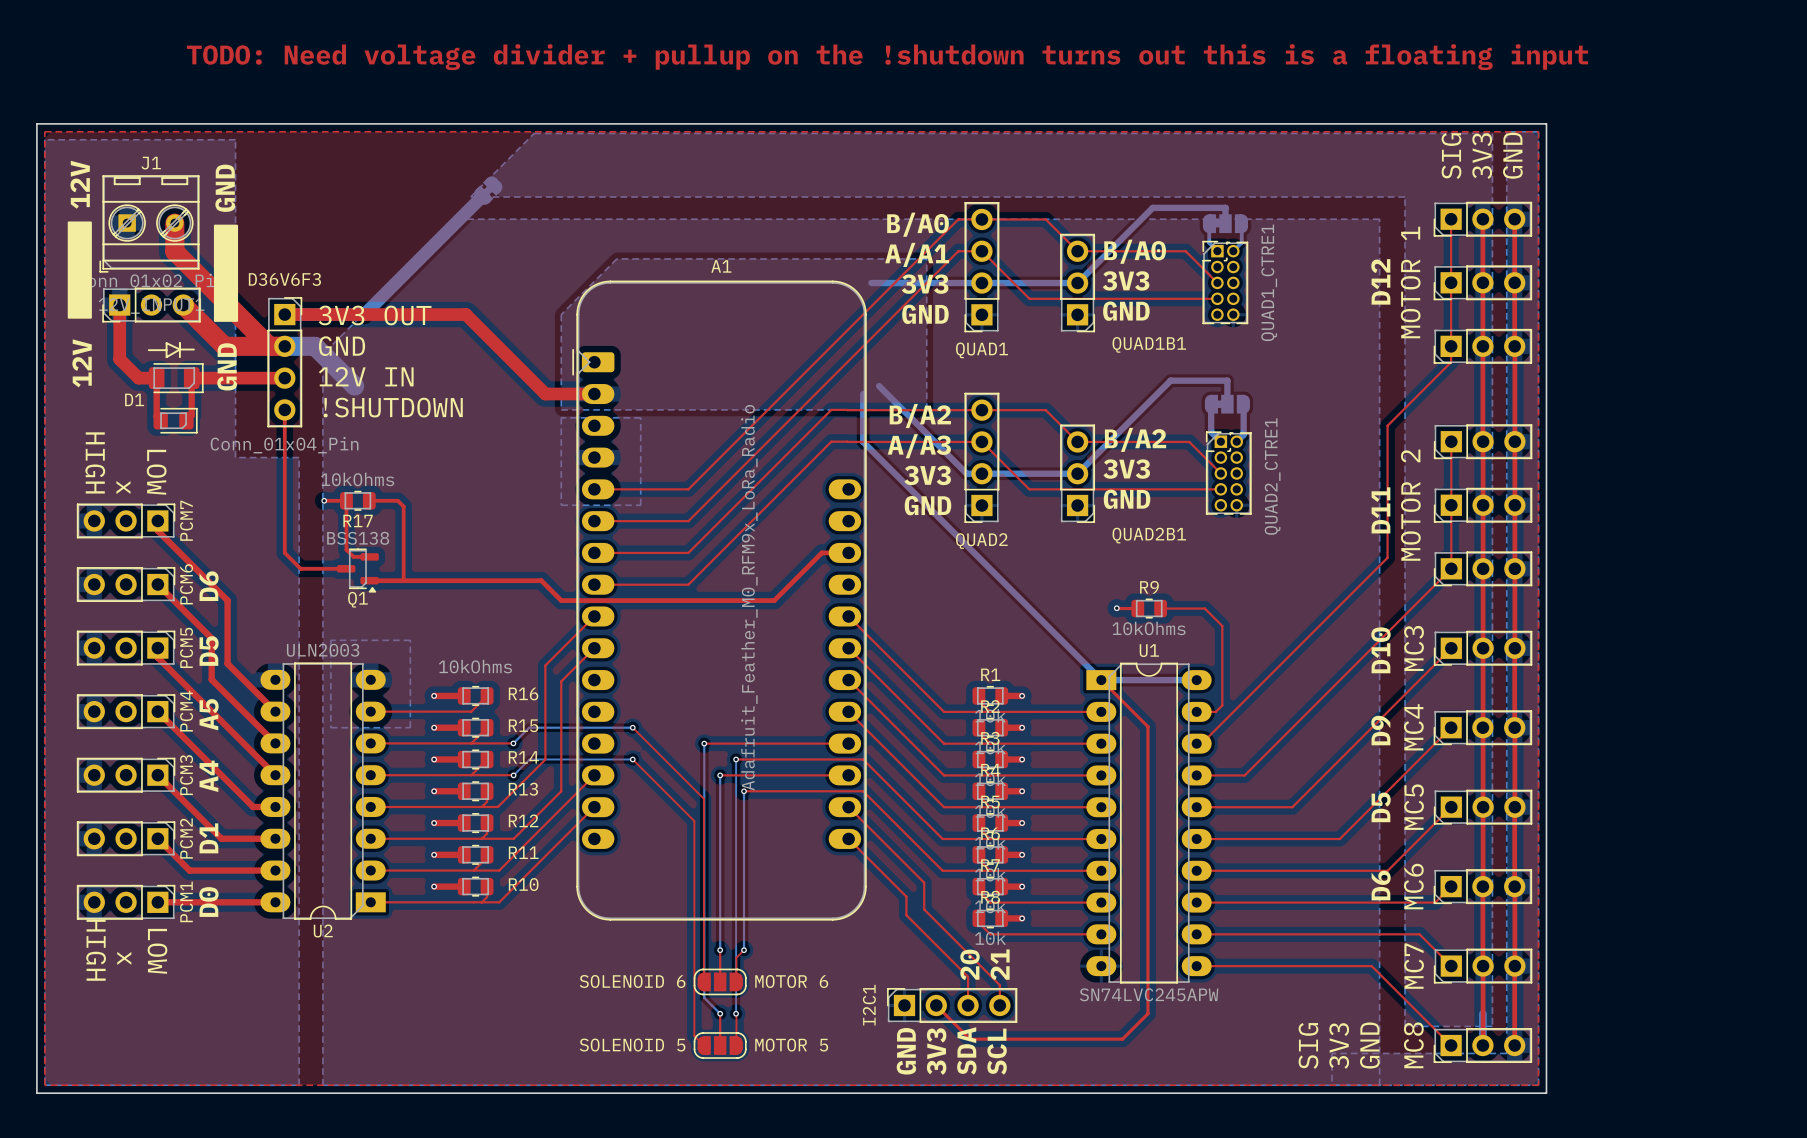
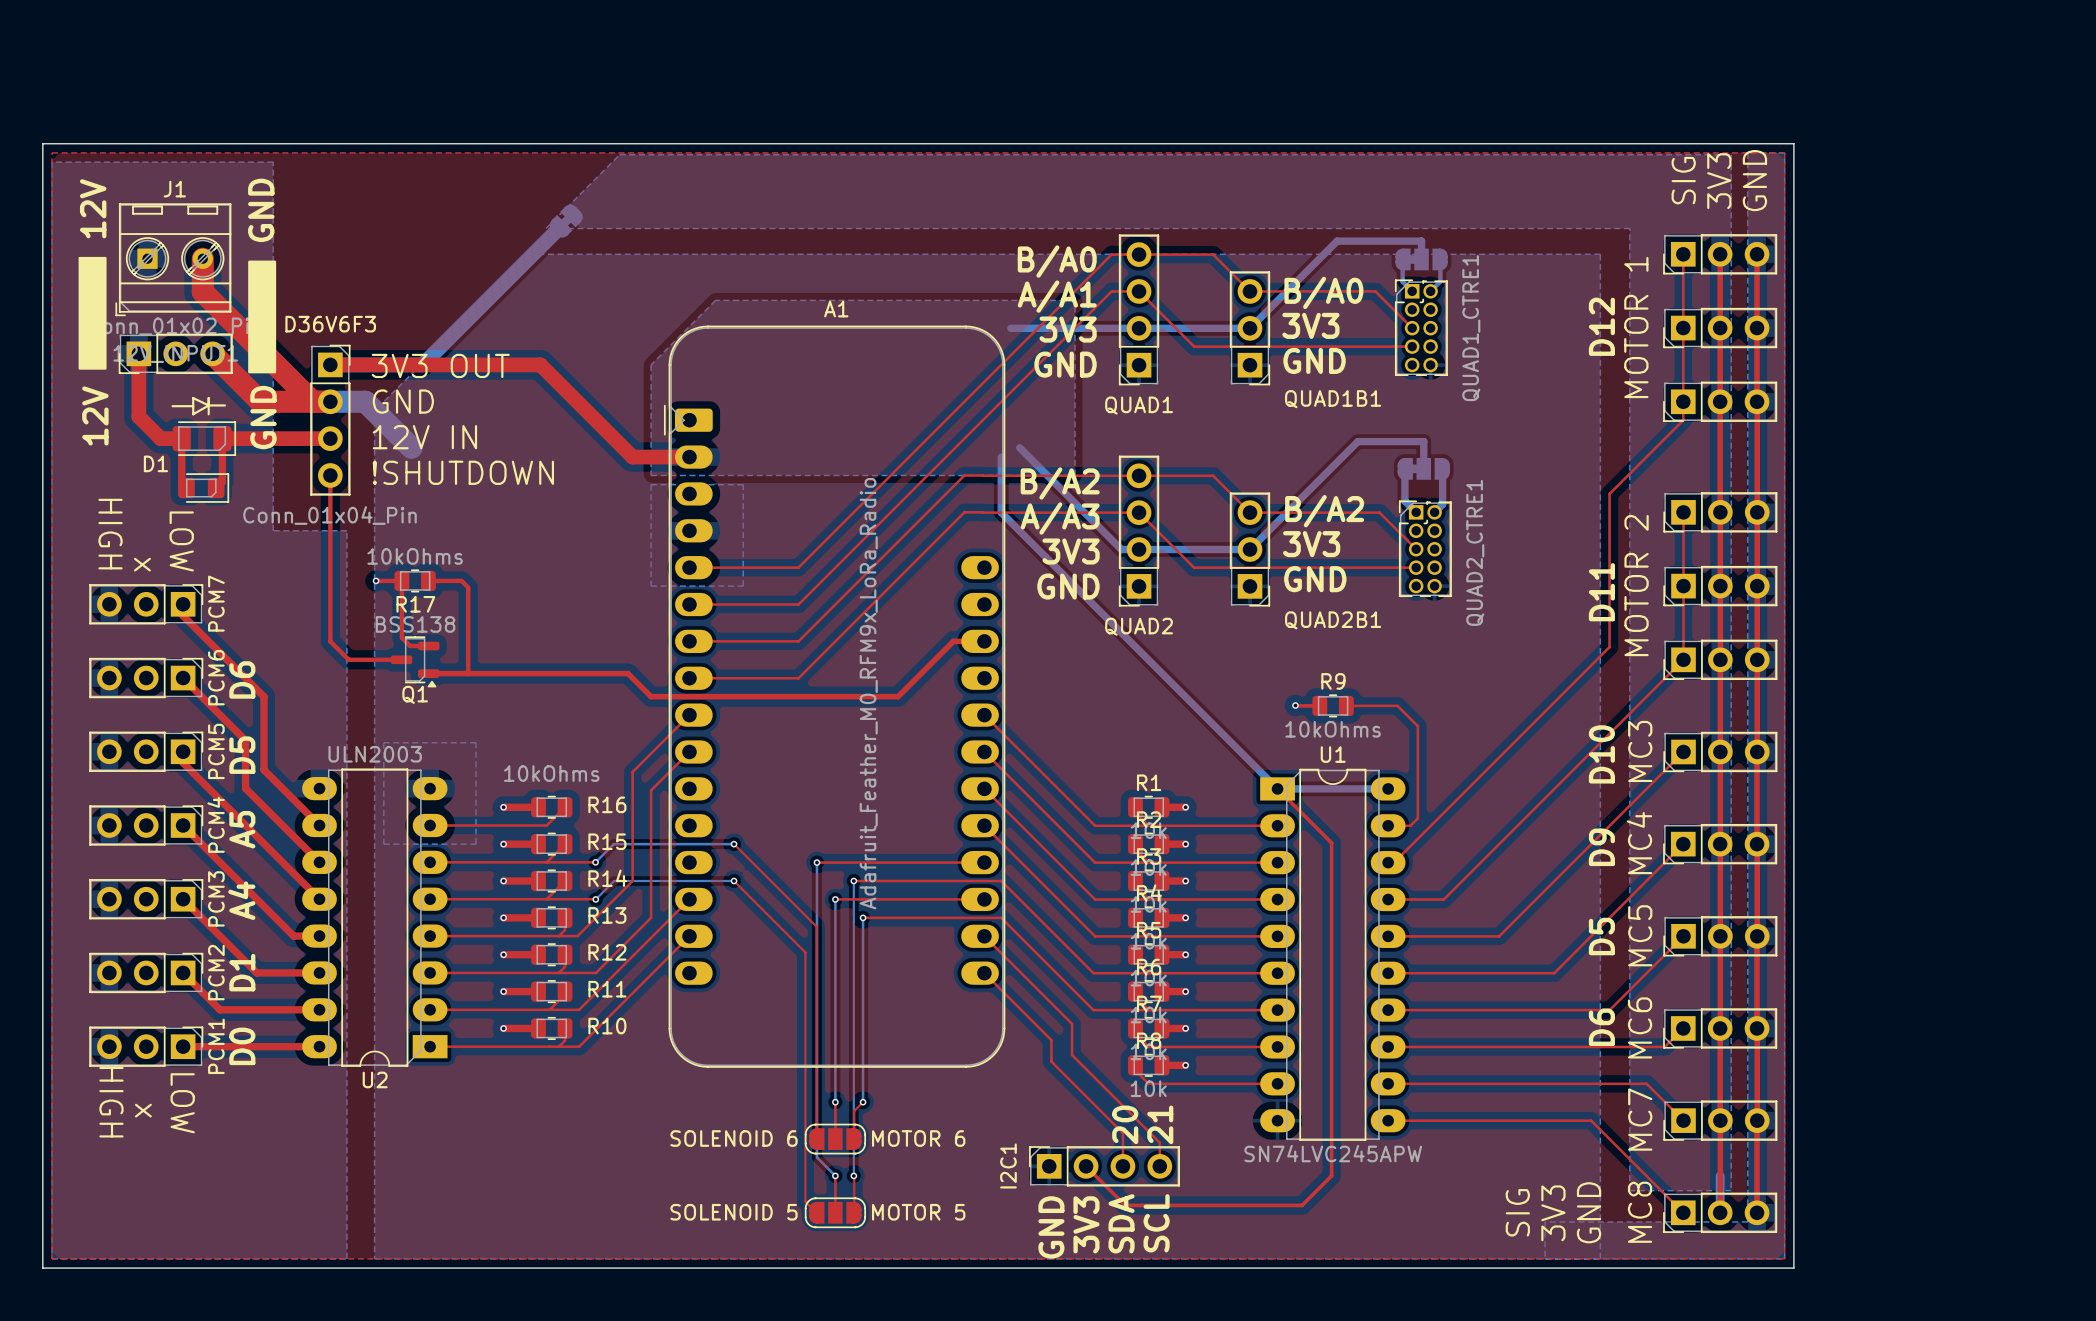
text: TODO: Need voltage divider + pullup on the !shutdown turns out this is a floating input (887, 57) -> none

